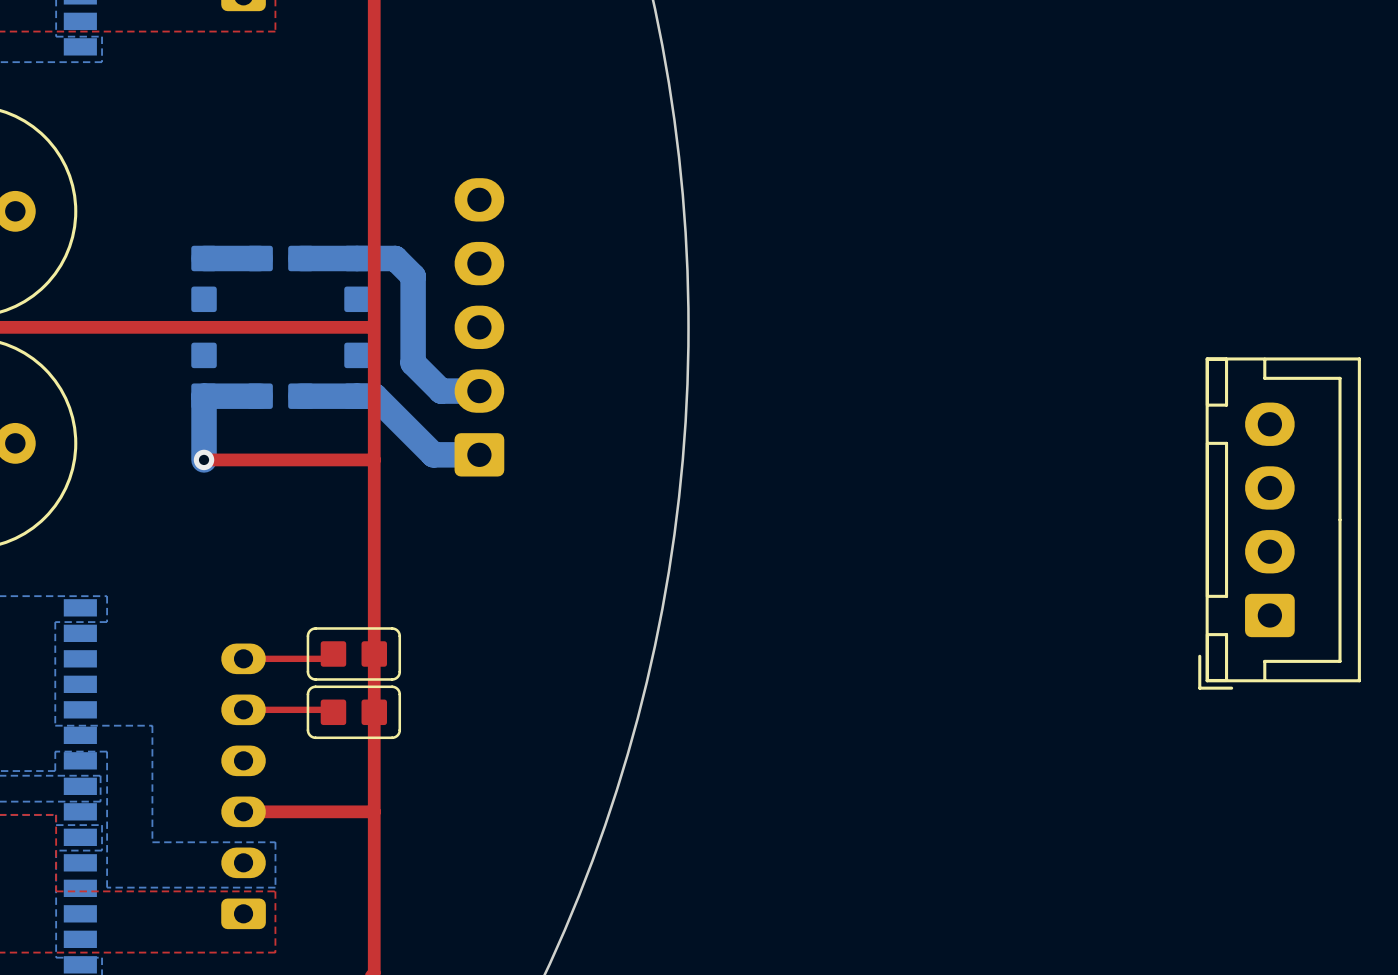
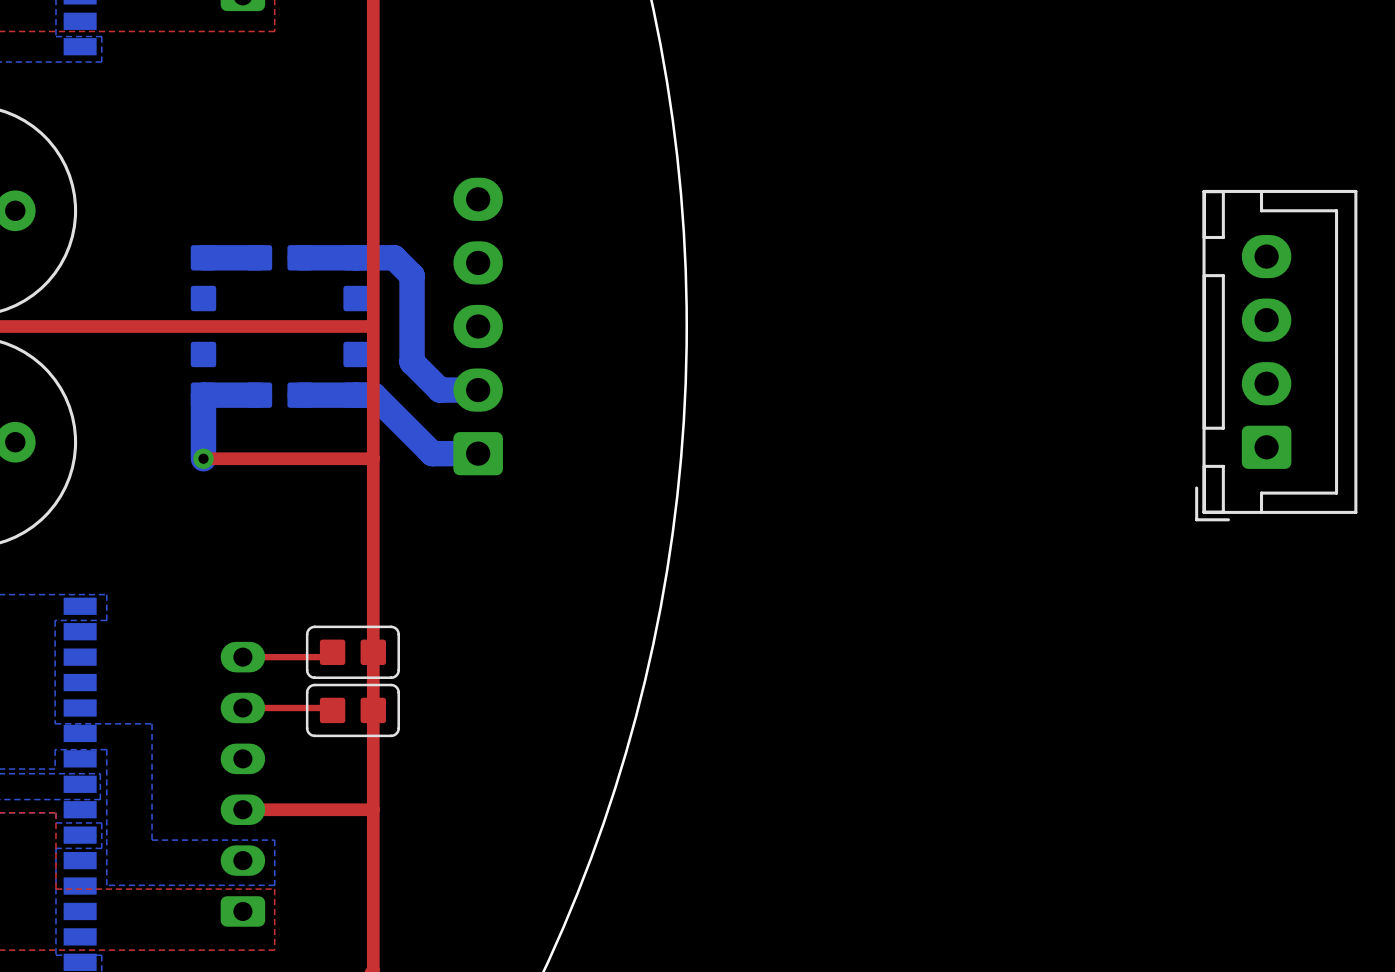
part position: (1279, 523) -> (1276, 355)

